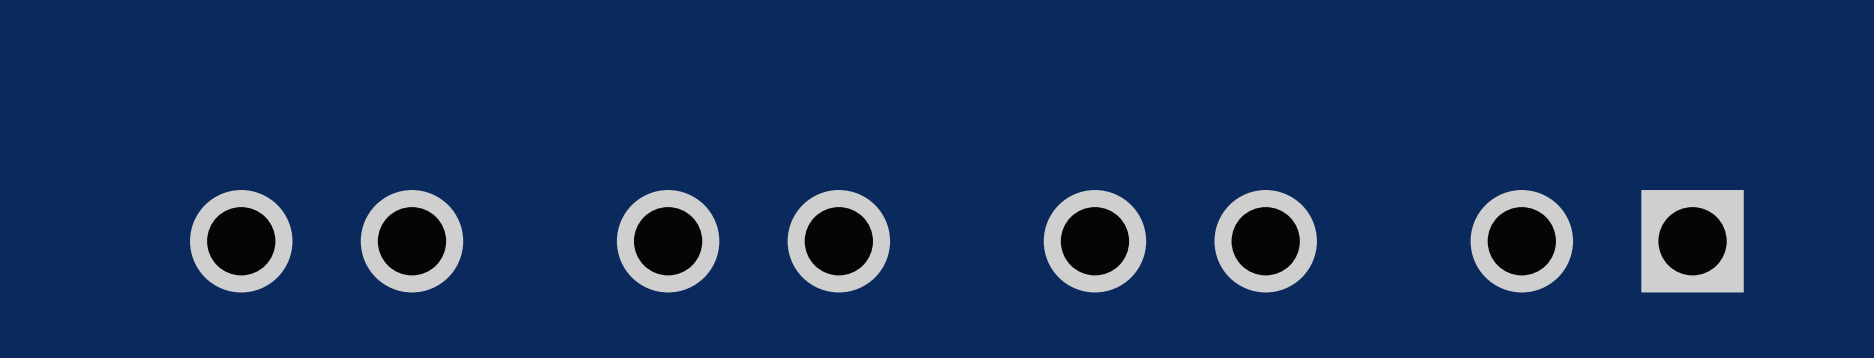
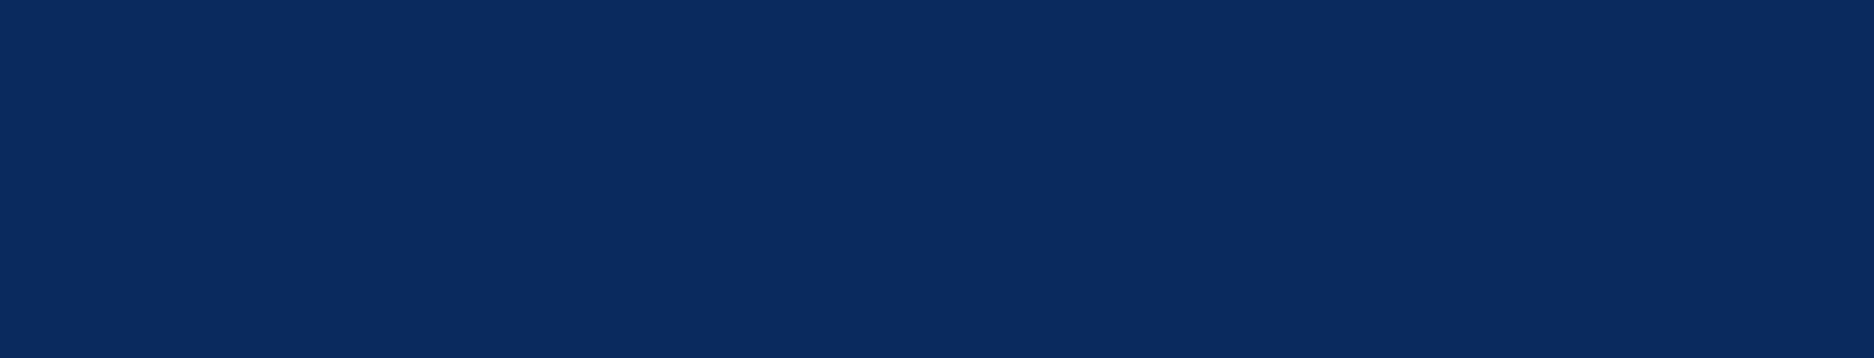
part: (966, 241) -> none

